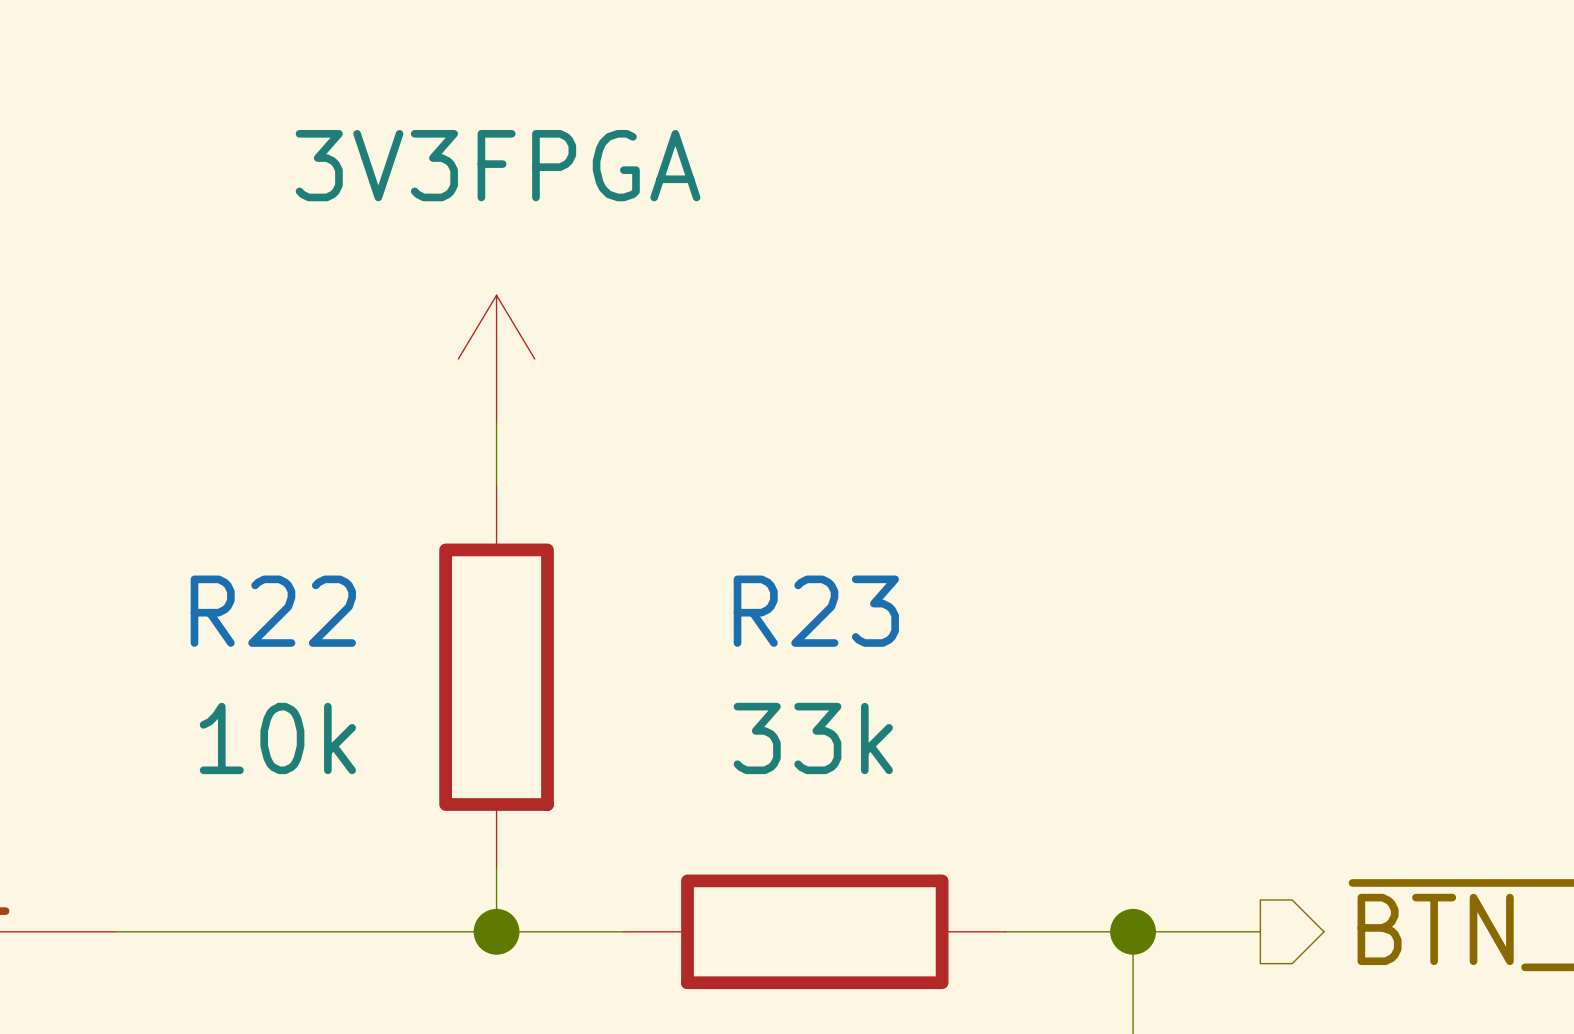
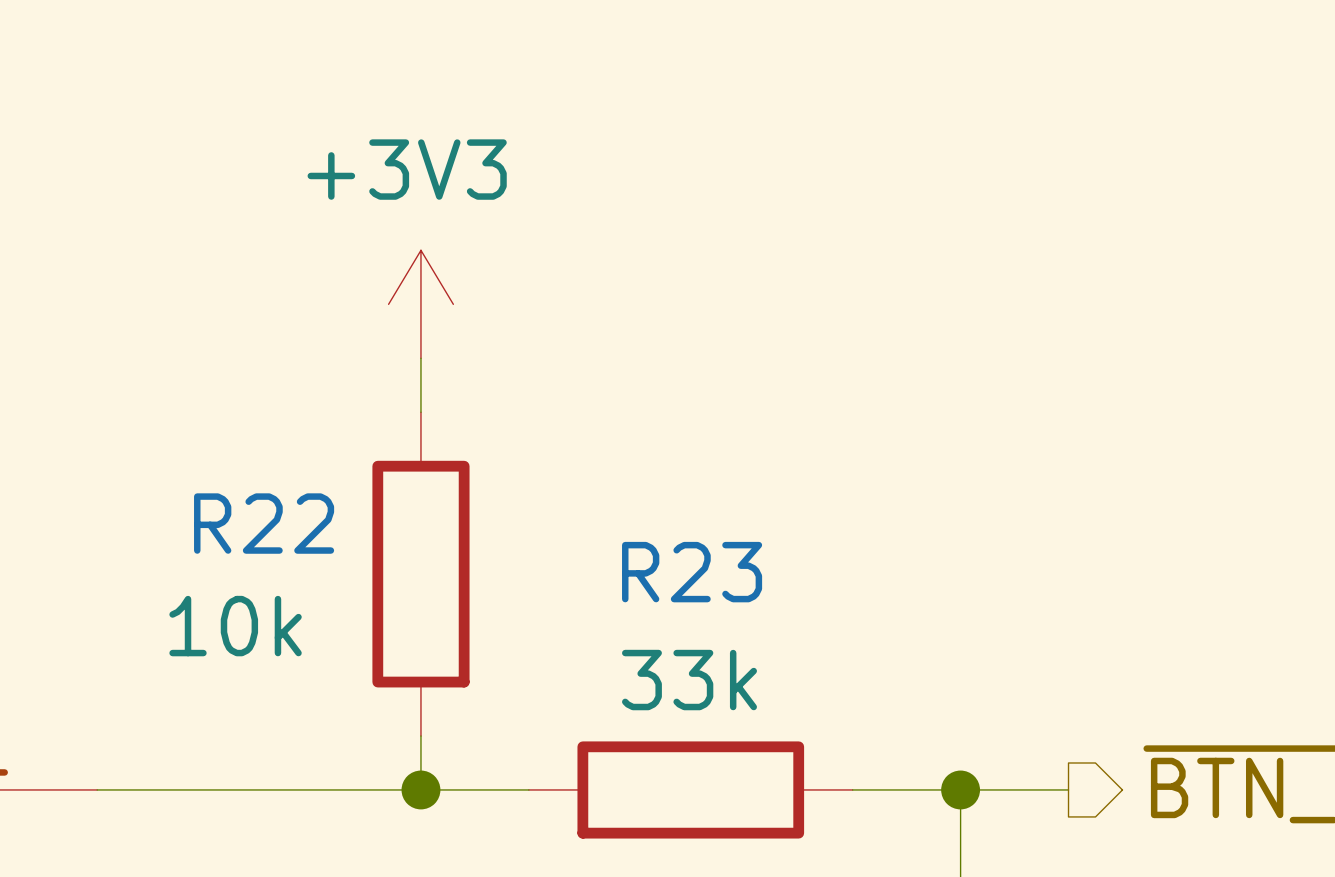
power symbol: 3V3FPGA (496, 358) -> +3V3 (420, 304)
R22 name position: R22 (273, 611) -> R22 (264, 523)
R23 name position: R23 (816, 611) -> R23 (692, 572)
R23 value position: 33k (813, 738) -> 33k (689, 680)

